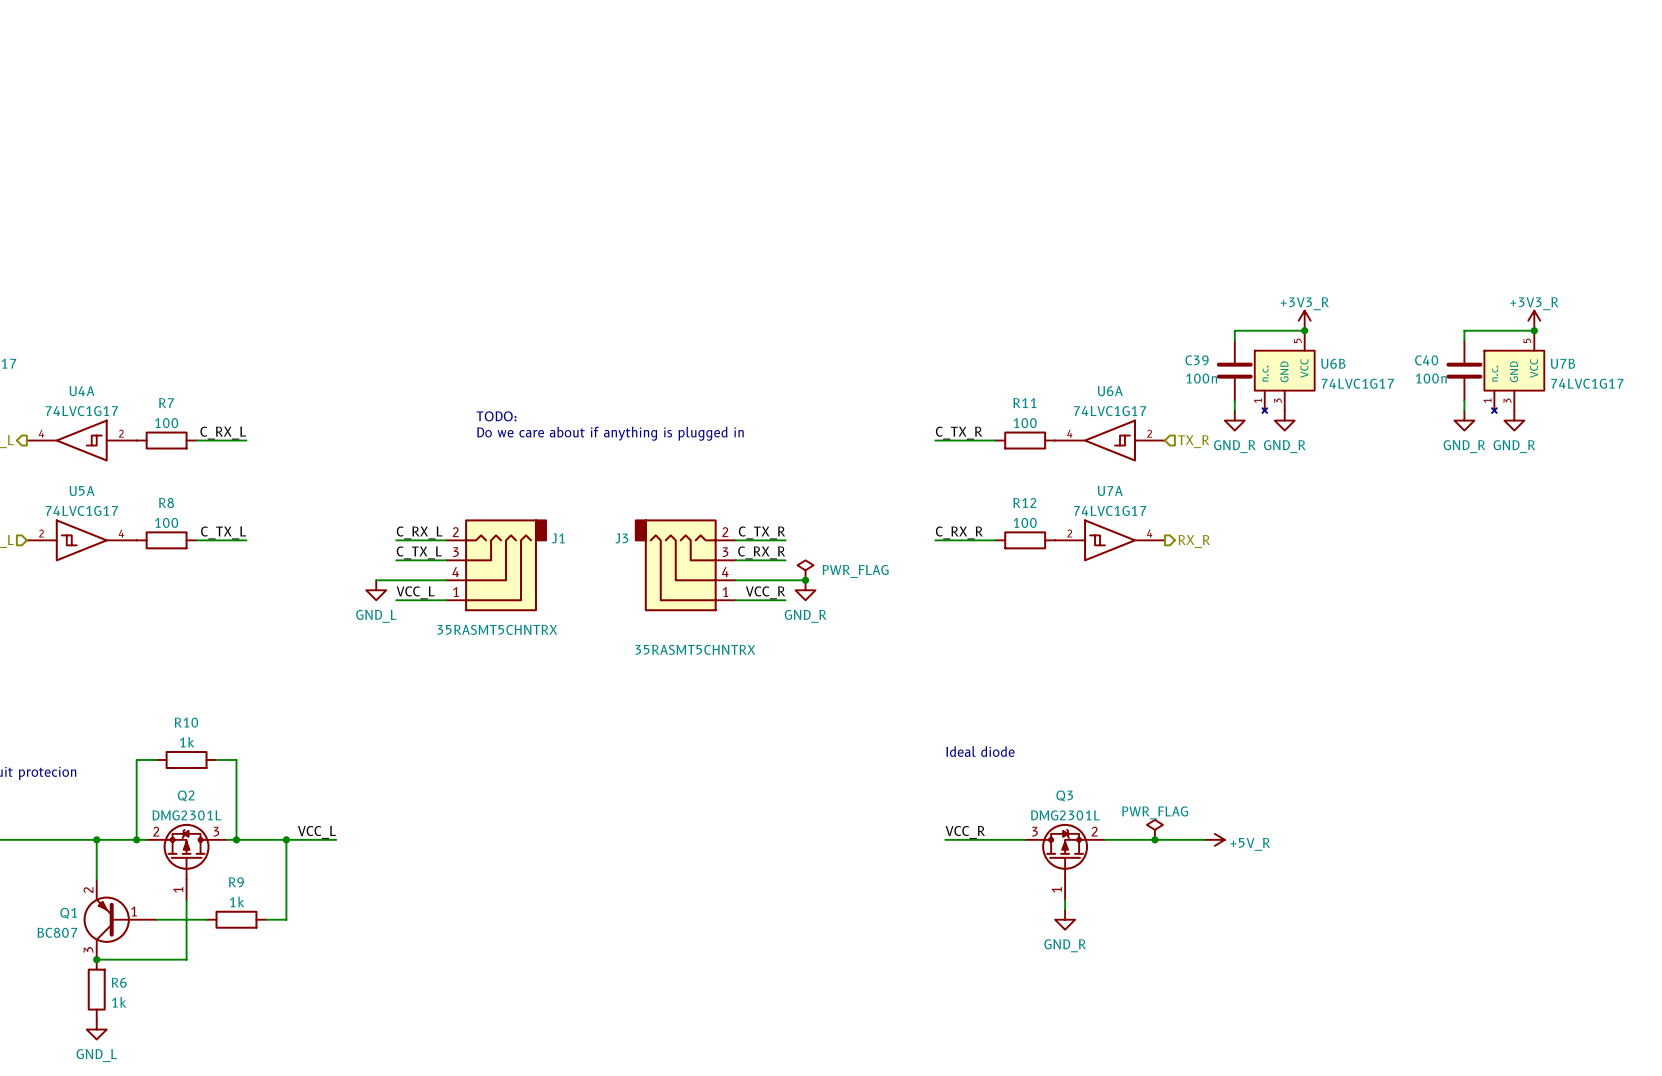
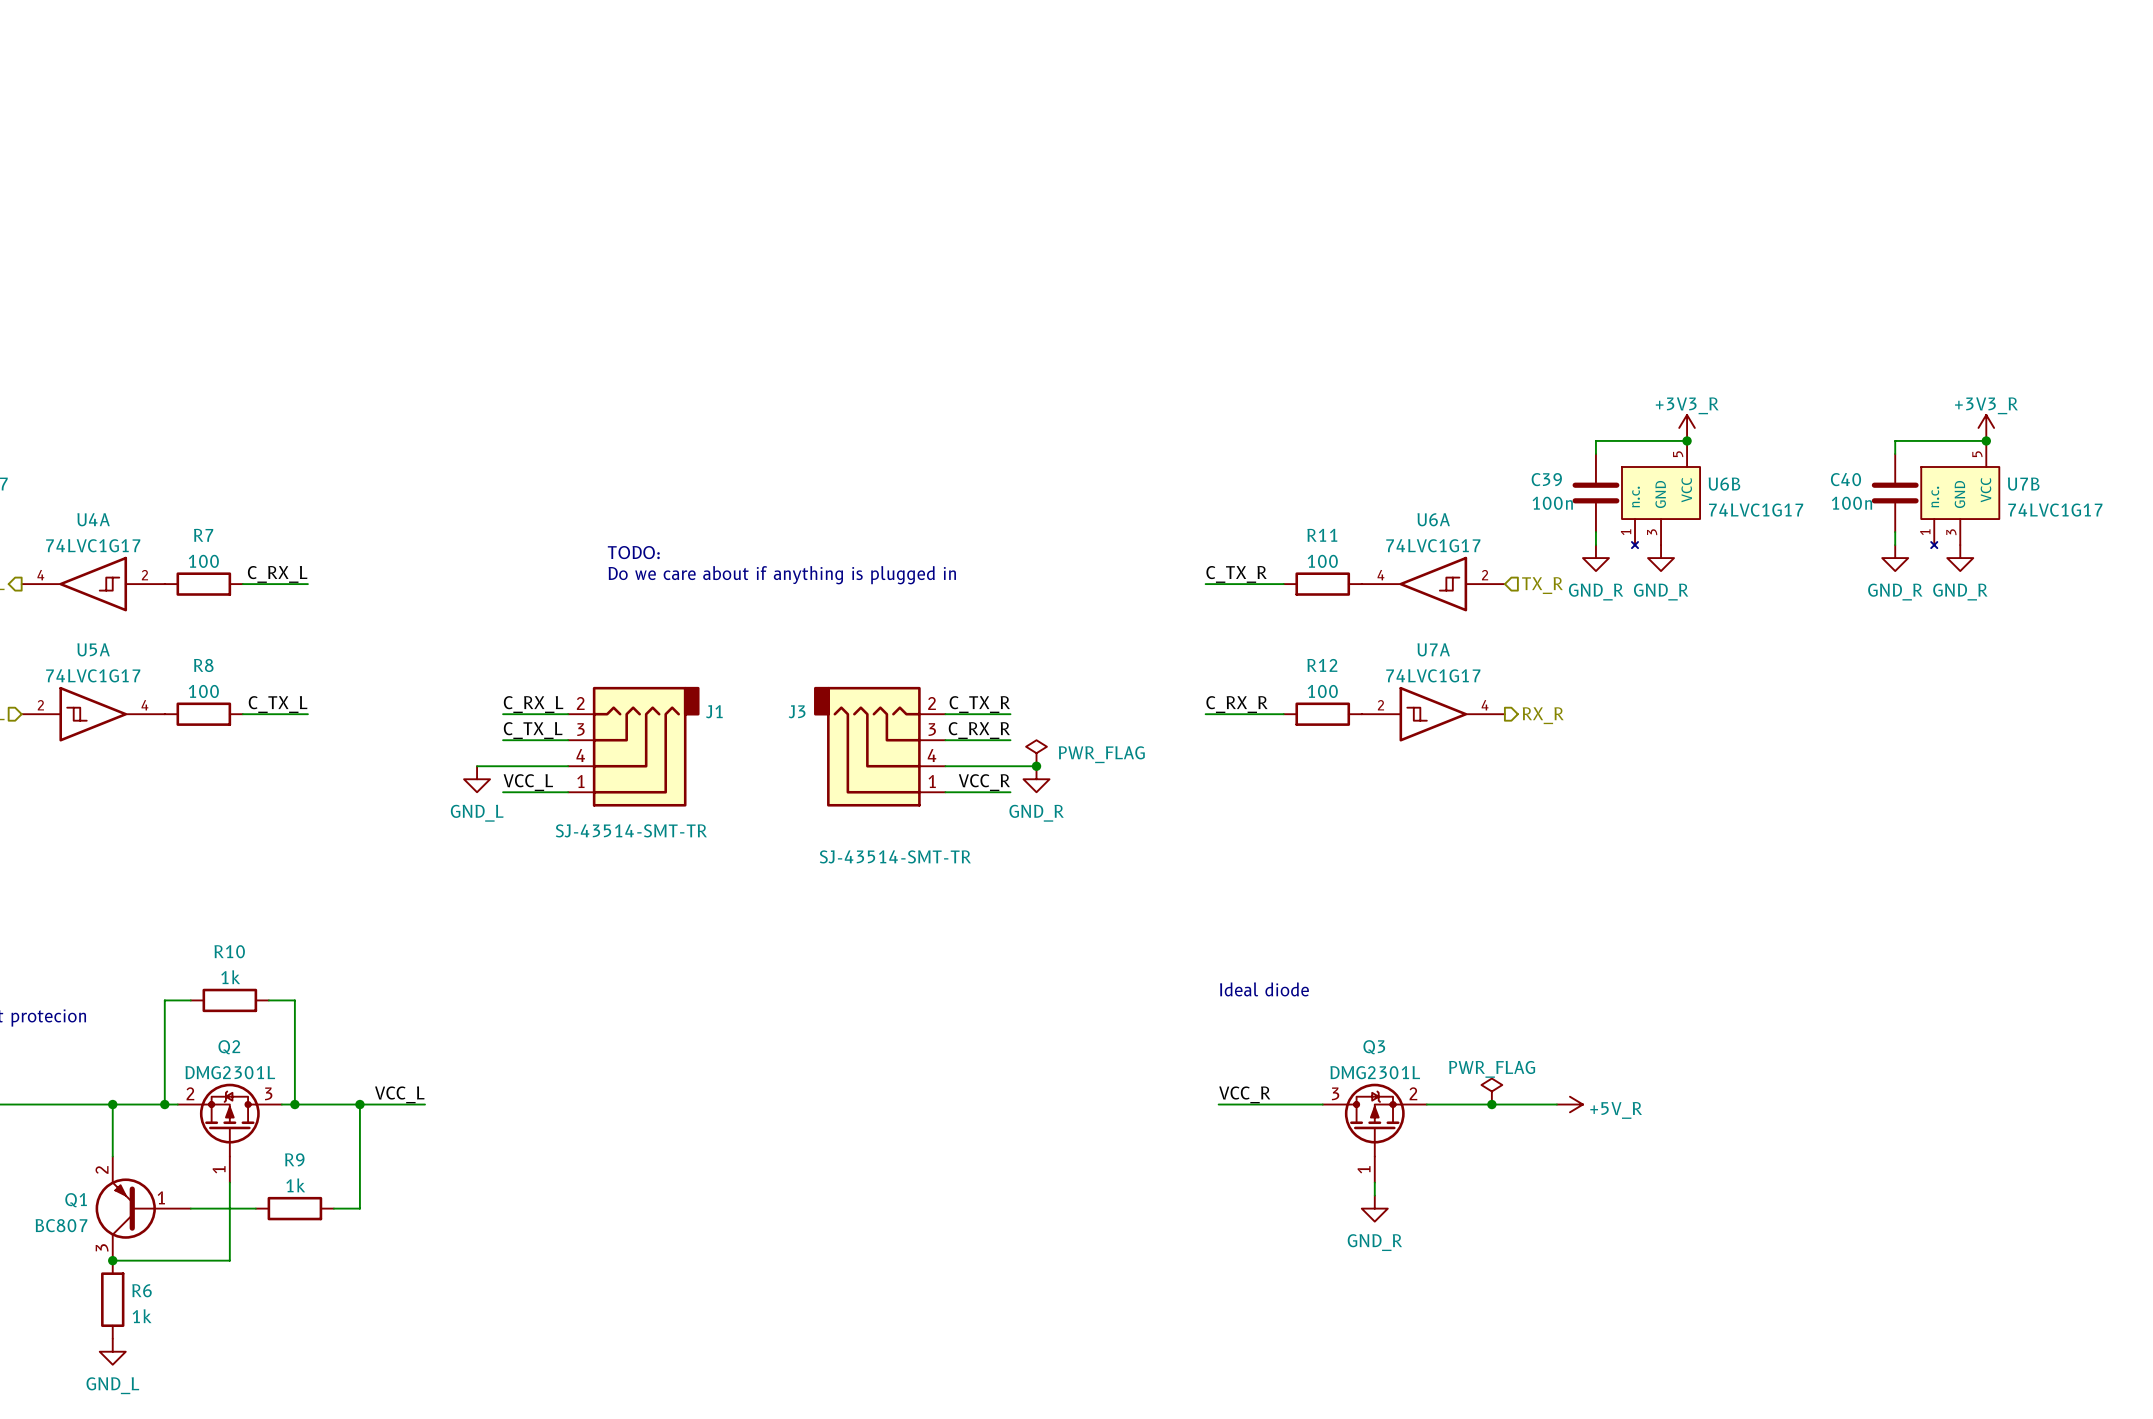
J1 value: 35RASMT5CHNTRX (497, 629) -> SJ-43514-SMT-TR (631, 830)
J3 value: 35RASMT5CHNTRX (695, 649) -> SJ-43514-SMT-TR (895, 856)

